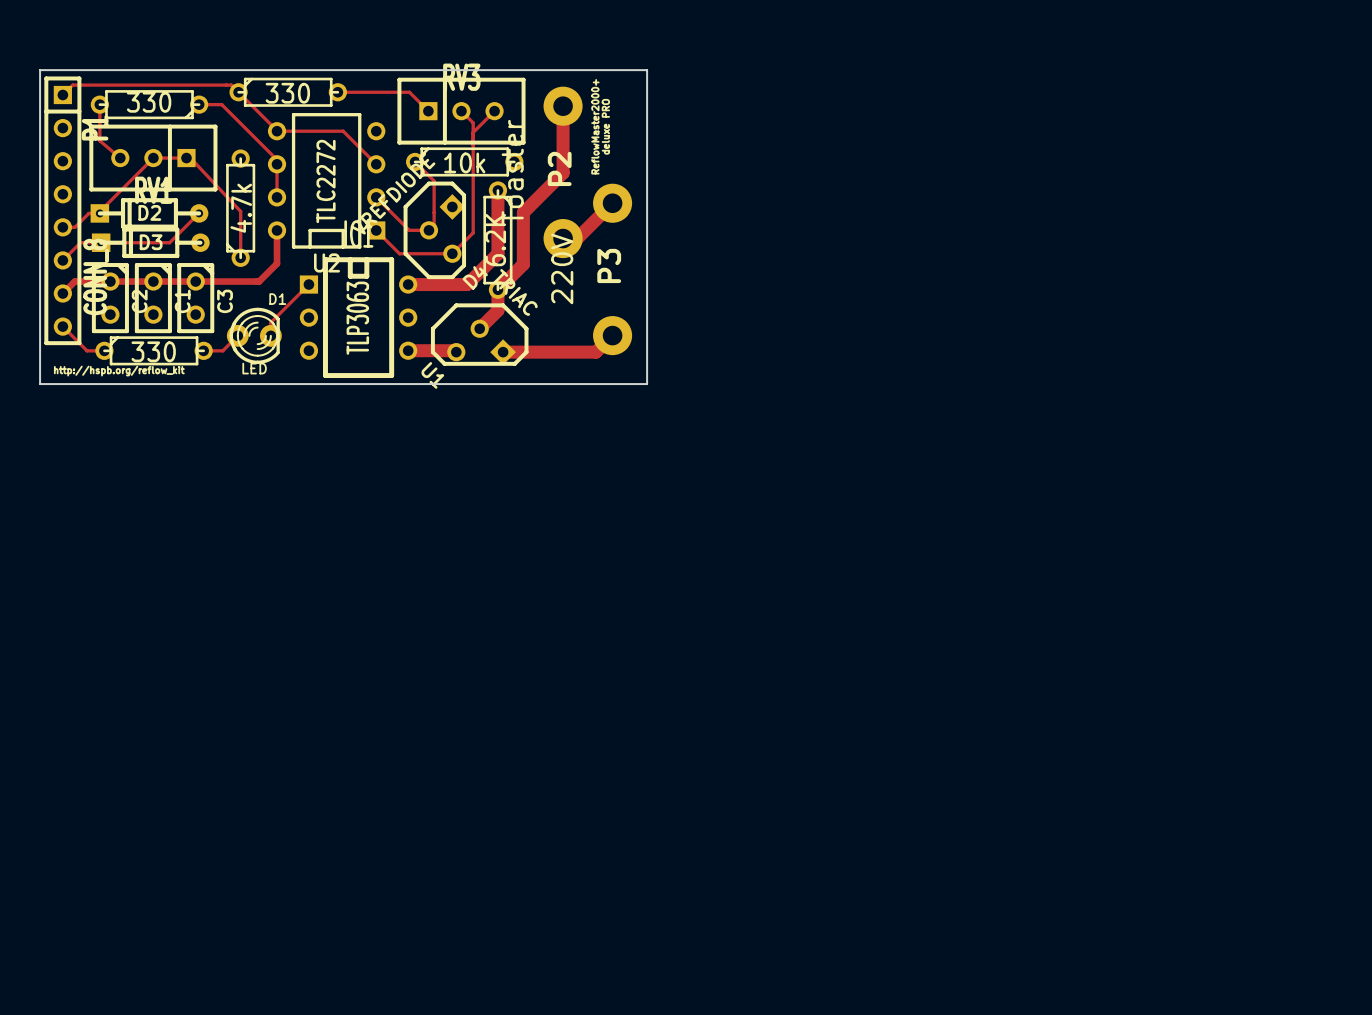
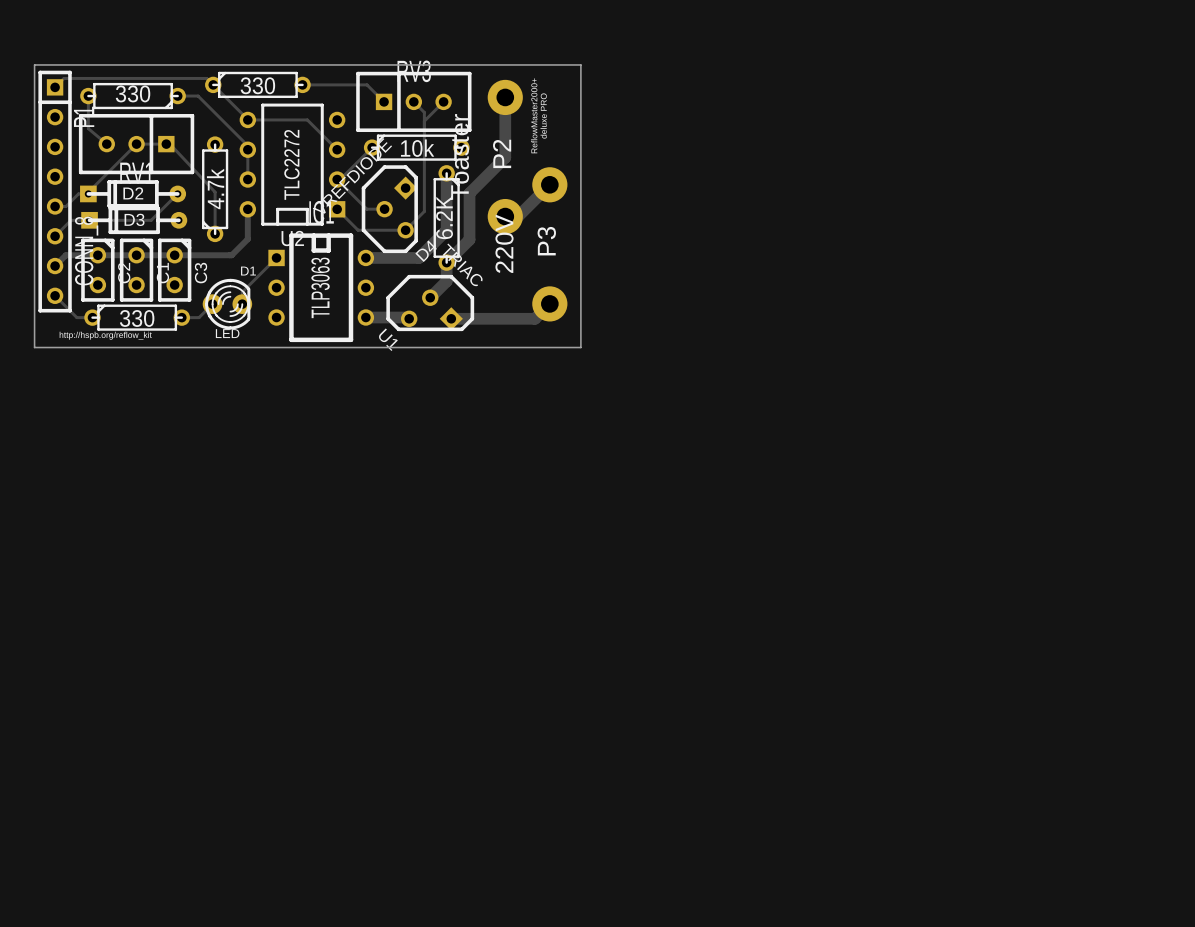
track: (415, 161) (434, 180) (434, 225) (428, 230) -> (372, 147) (340, 179) (337, 179)

